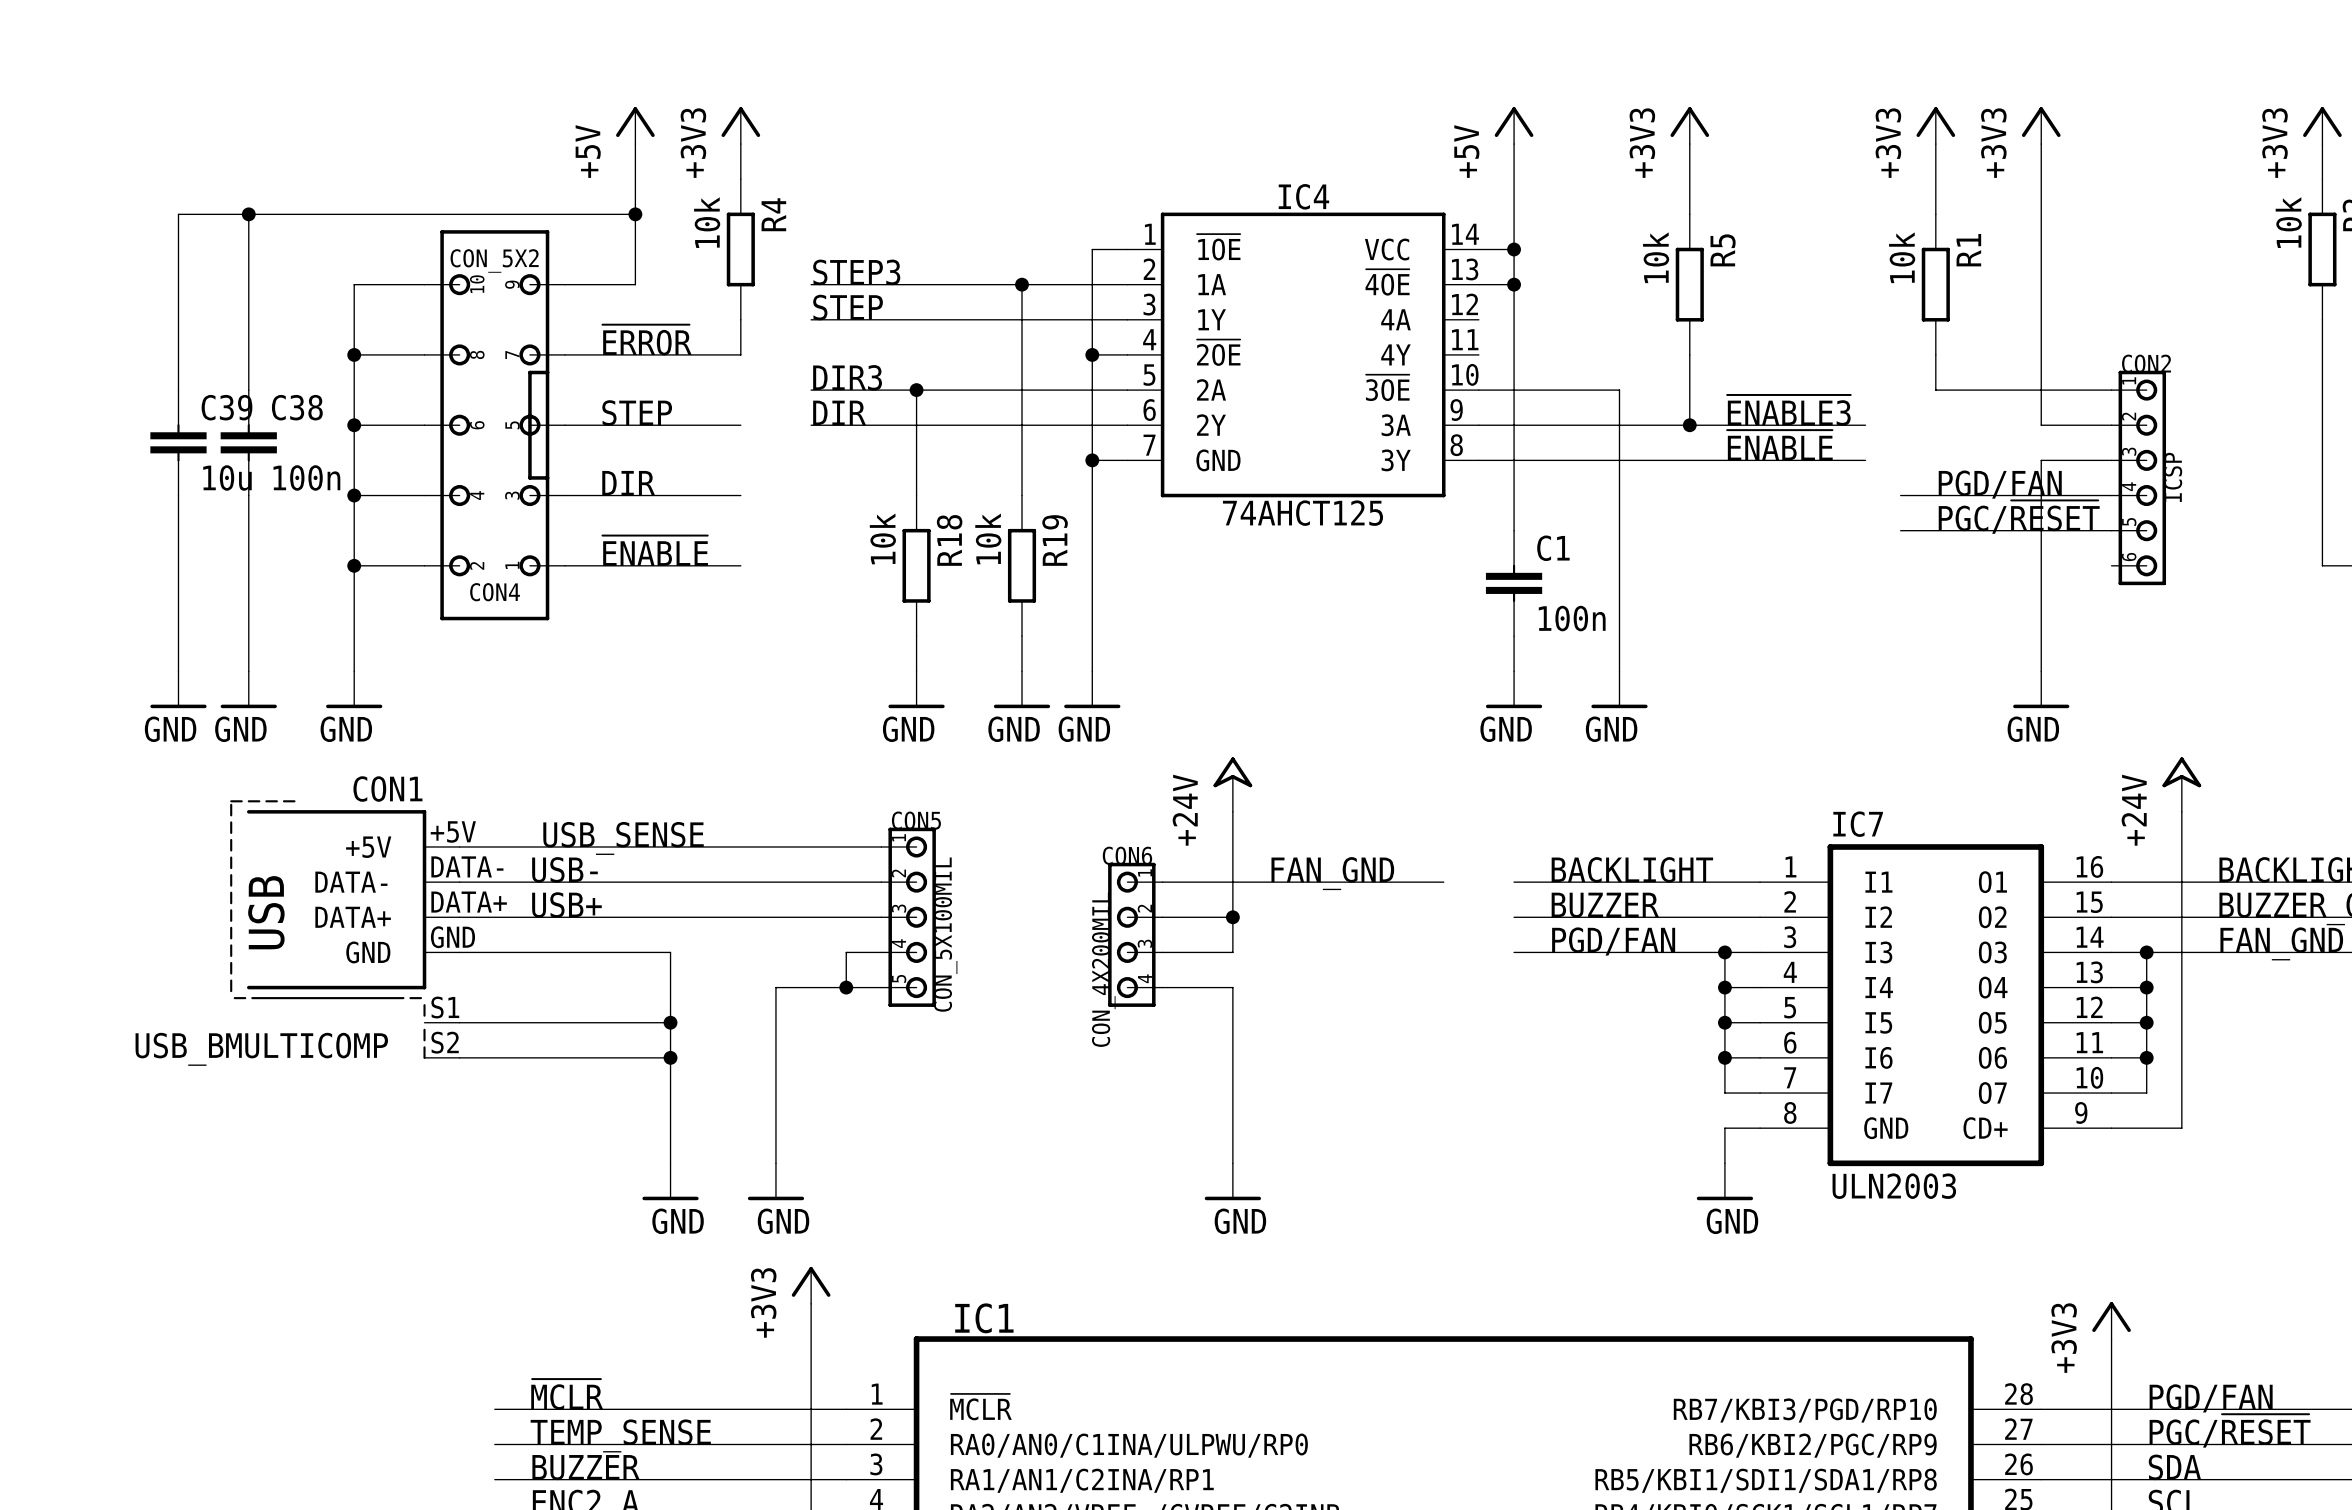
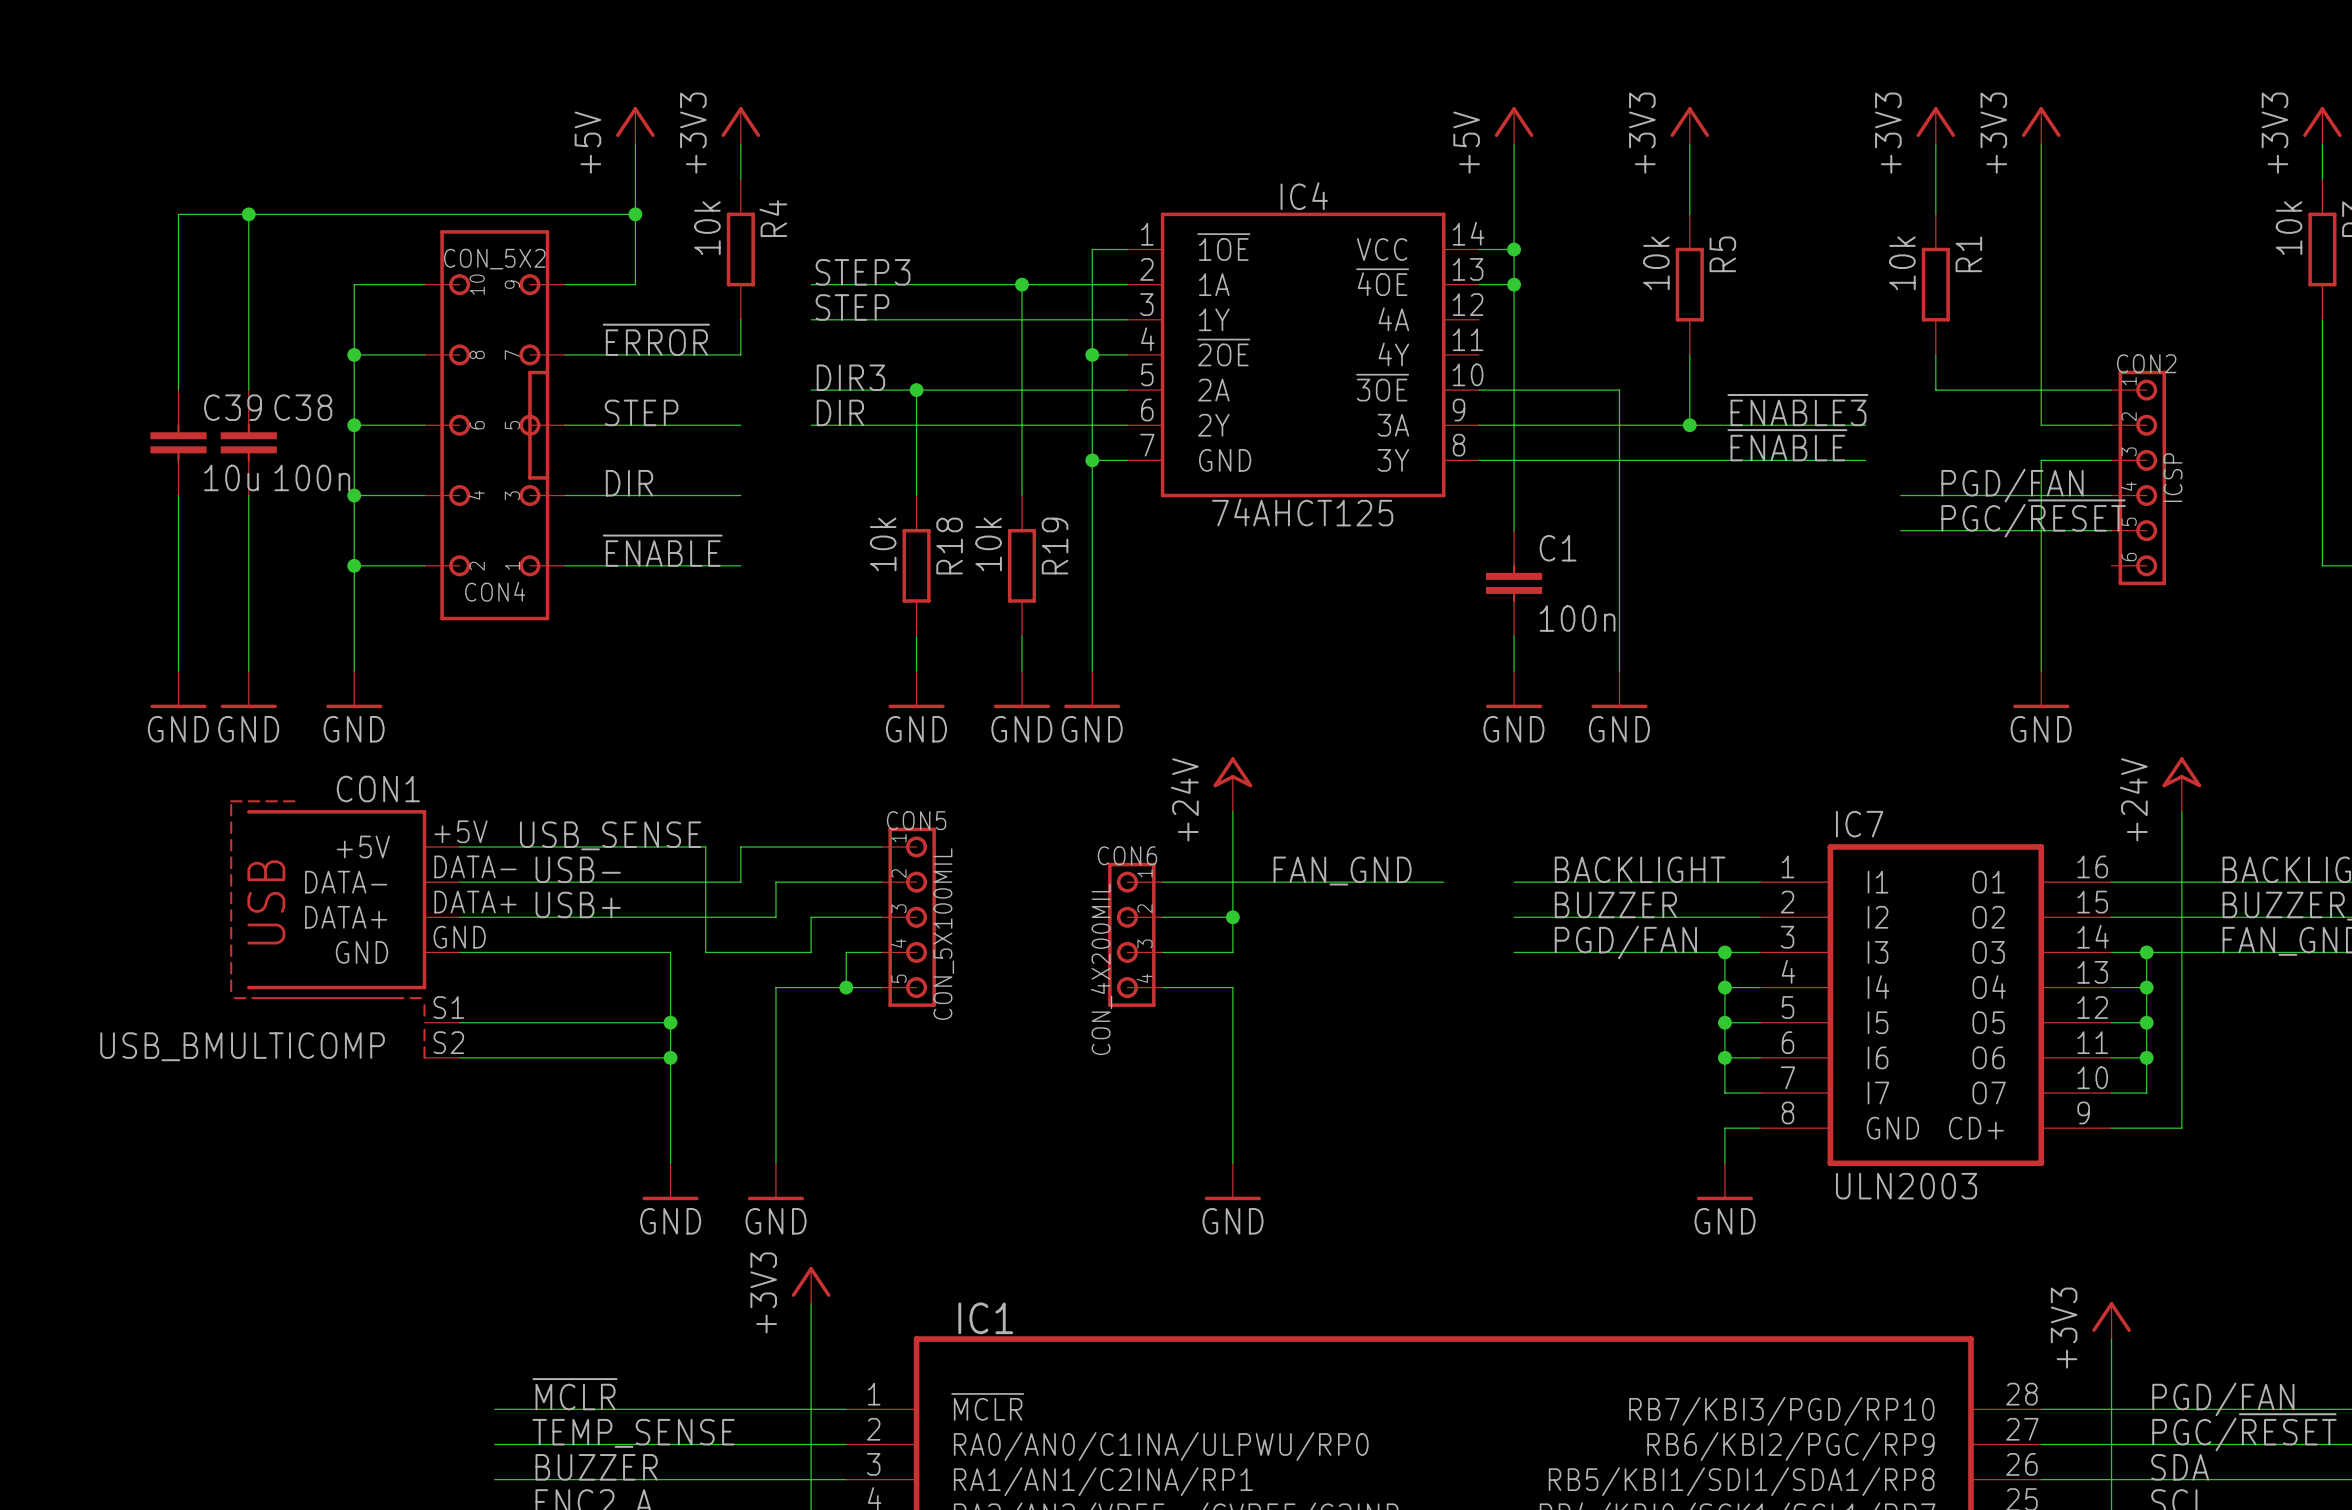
wire: (705, 846) (740, 846) -> (740, 882) (740, 846)
wire: (740, 882) (775, 882) -> (775, 917) (775, 882)
wire: (775, 917) (811, 917) -> (705, 846) (705, 952) (811, 952) (811, 917)

